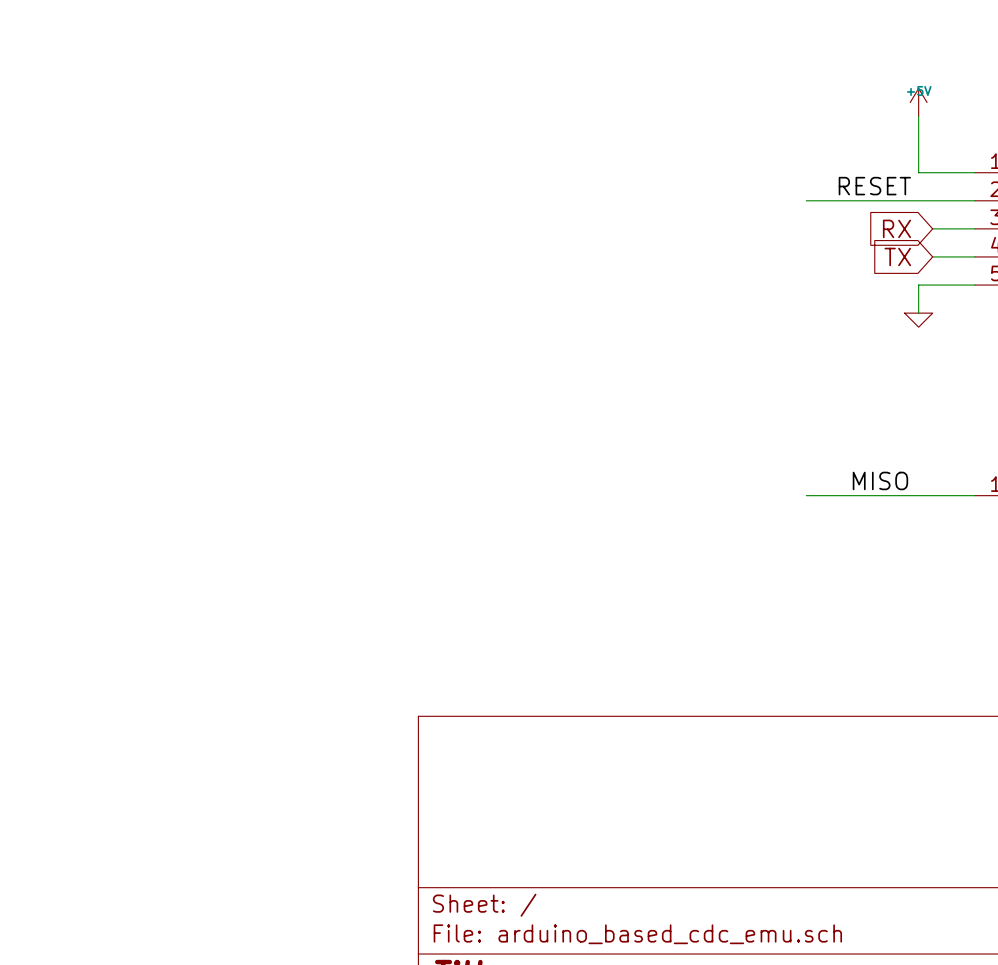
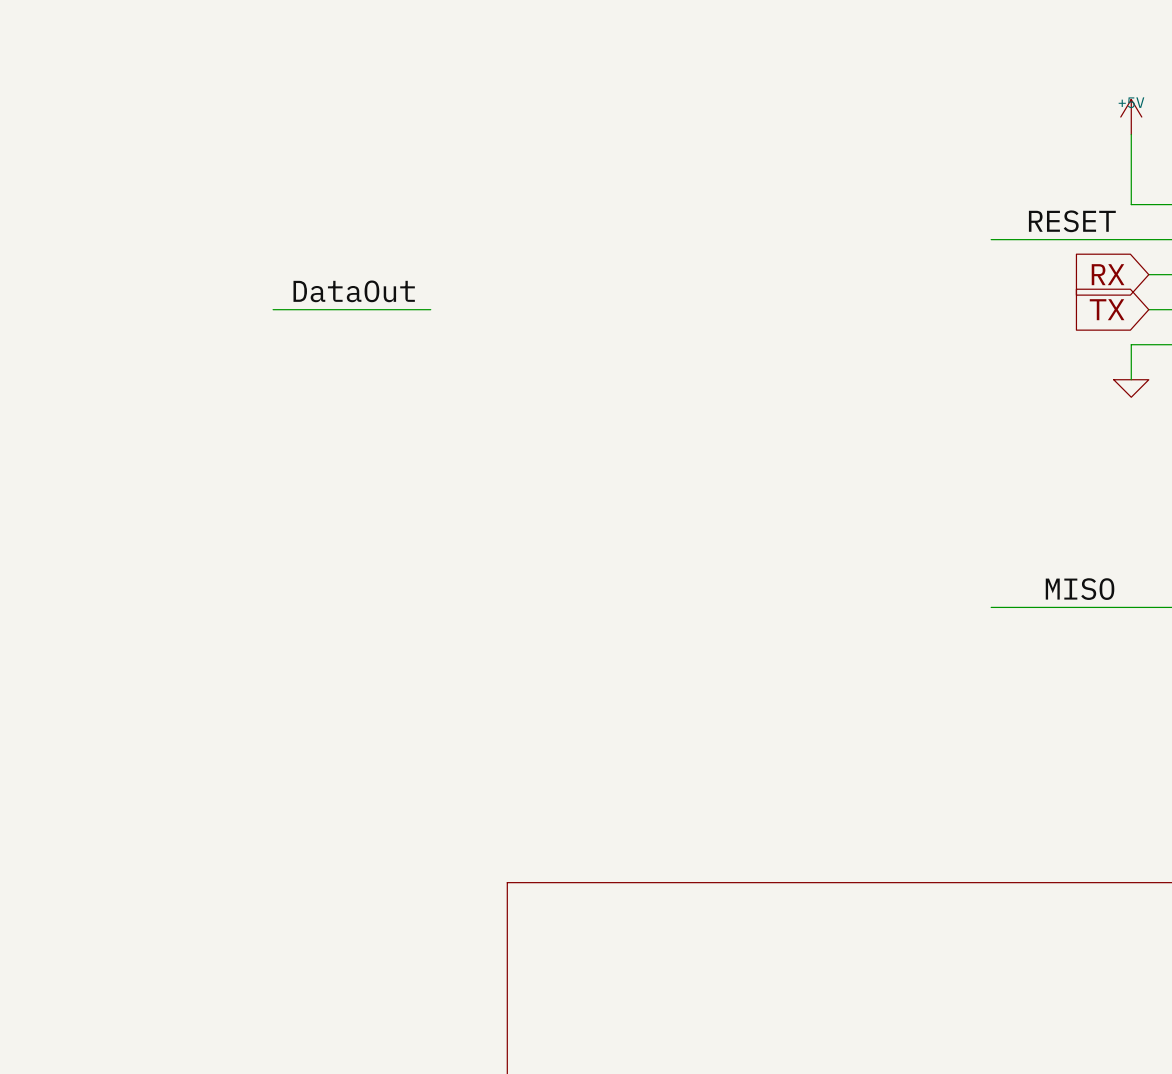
label: none -> DataOut (354, 291)
wire: none -> (273, 309) (430, 309)

